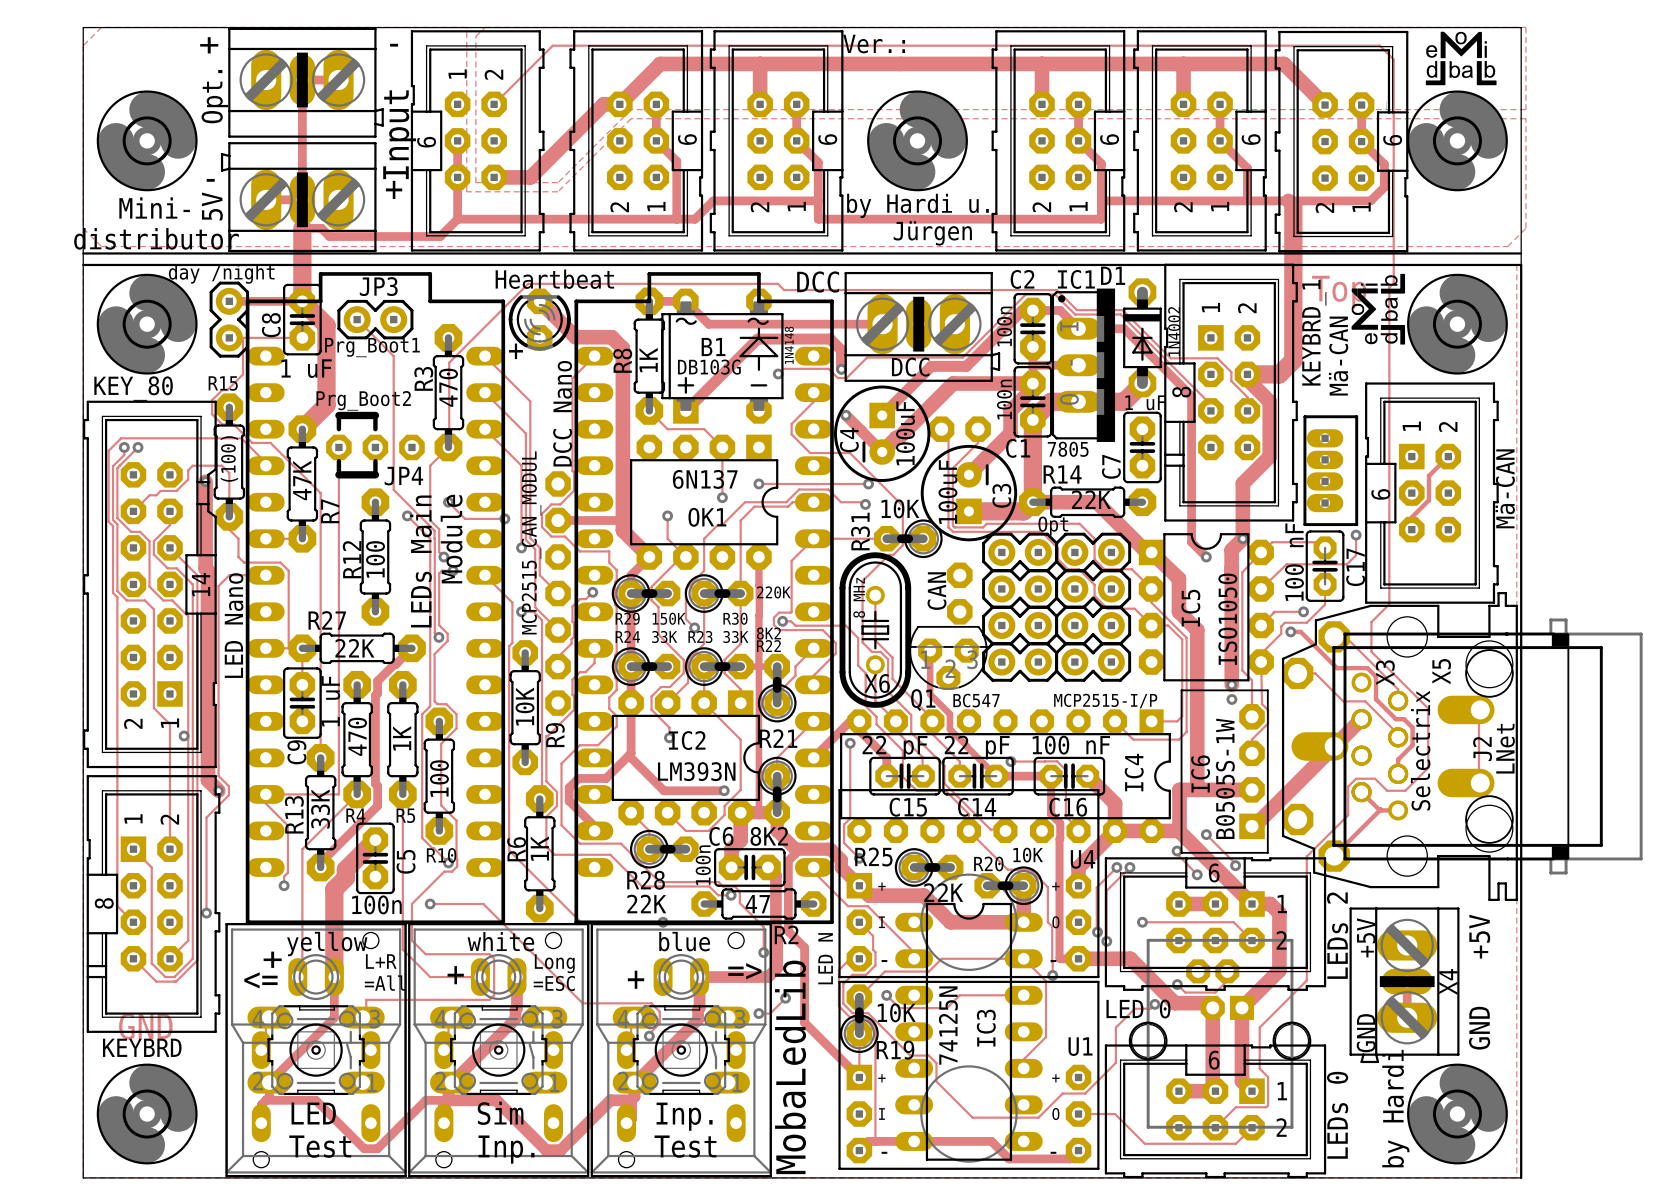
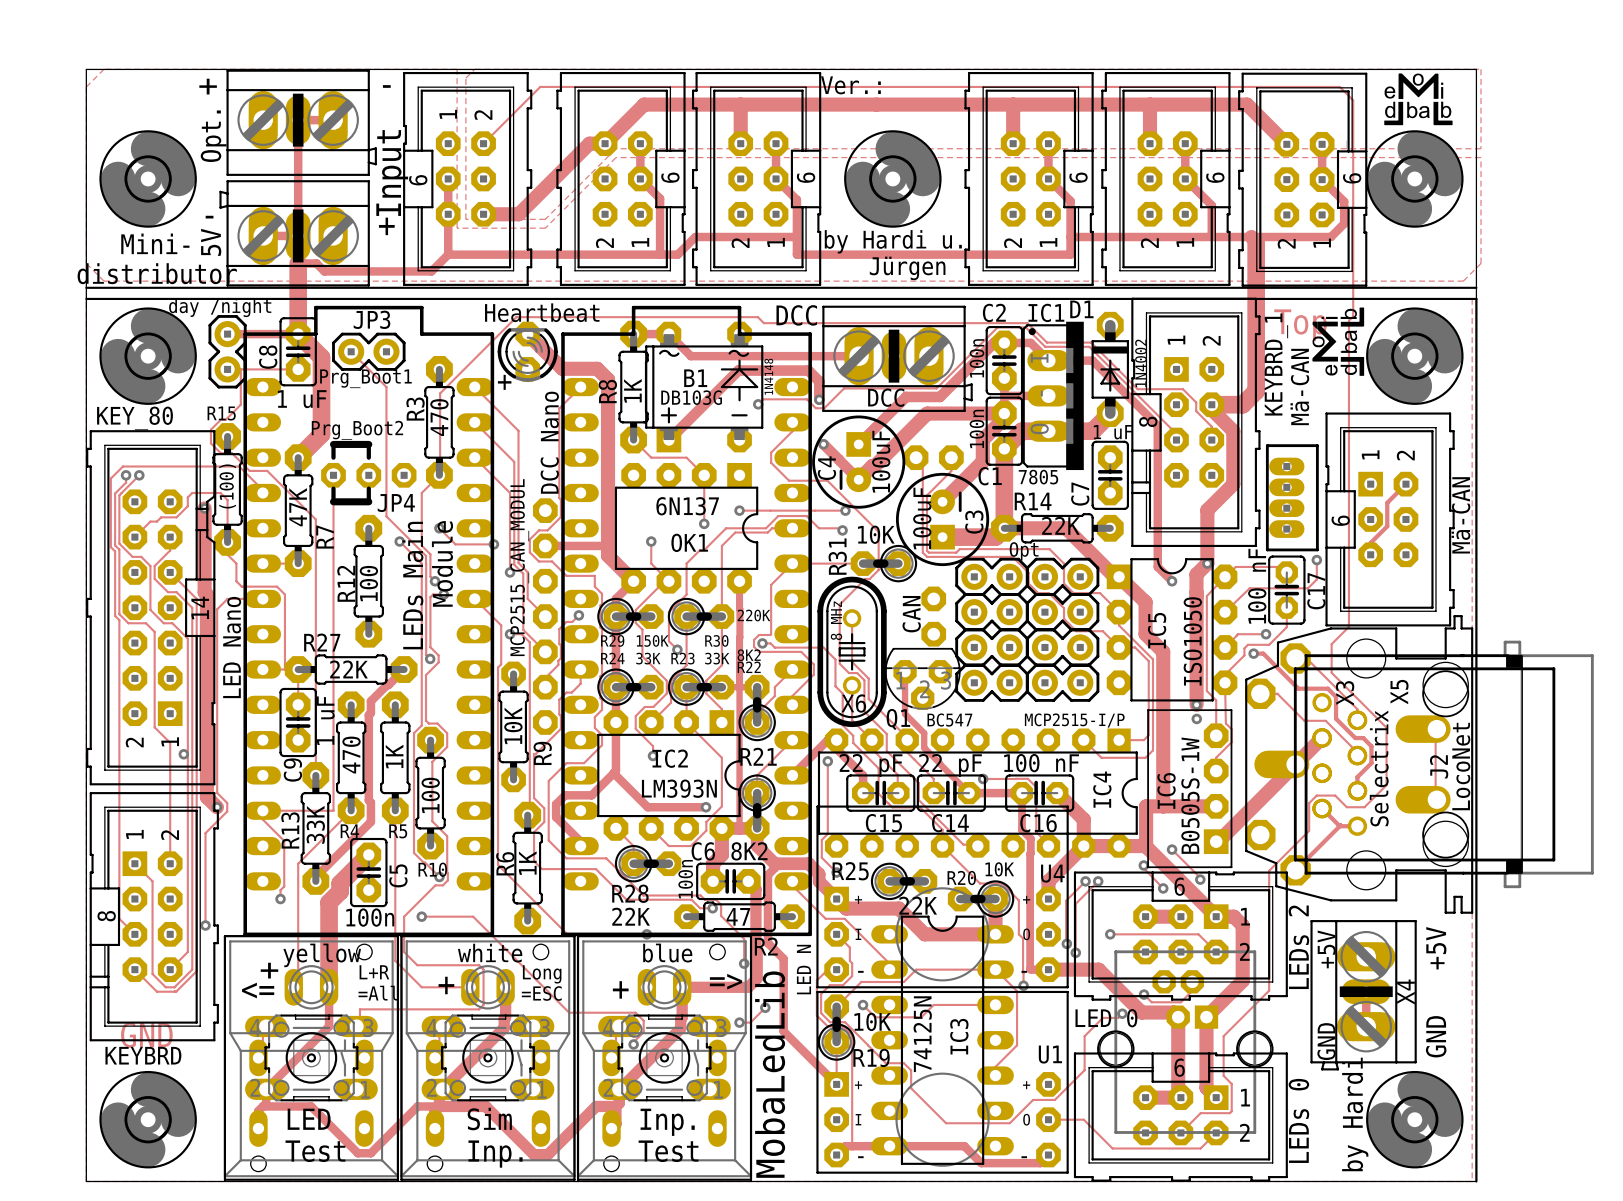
J2 value: LNet (1505, 748) -> LocoNet (1461, 766)

